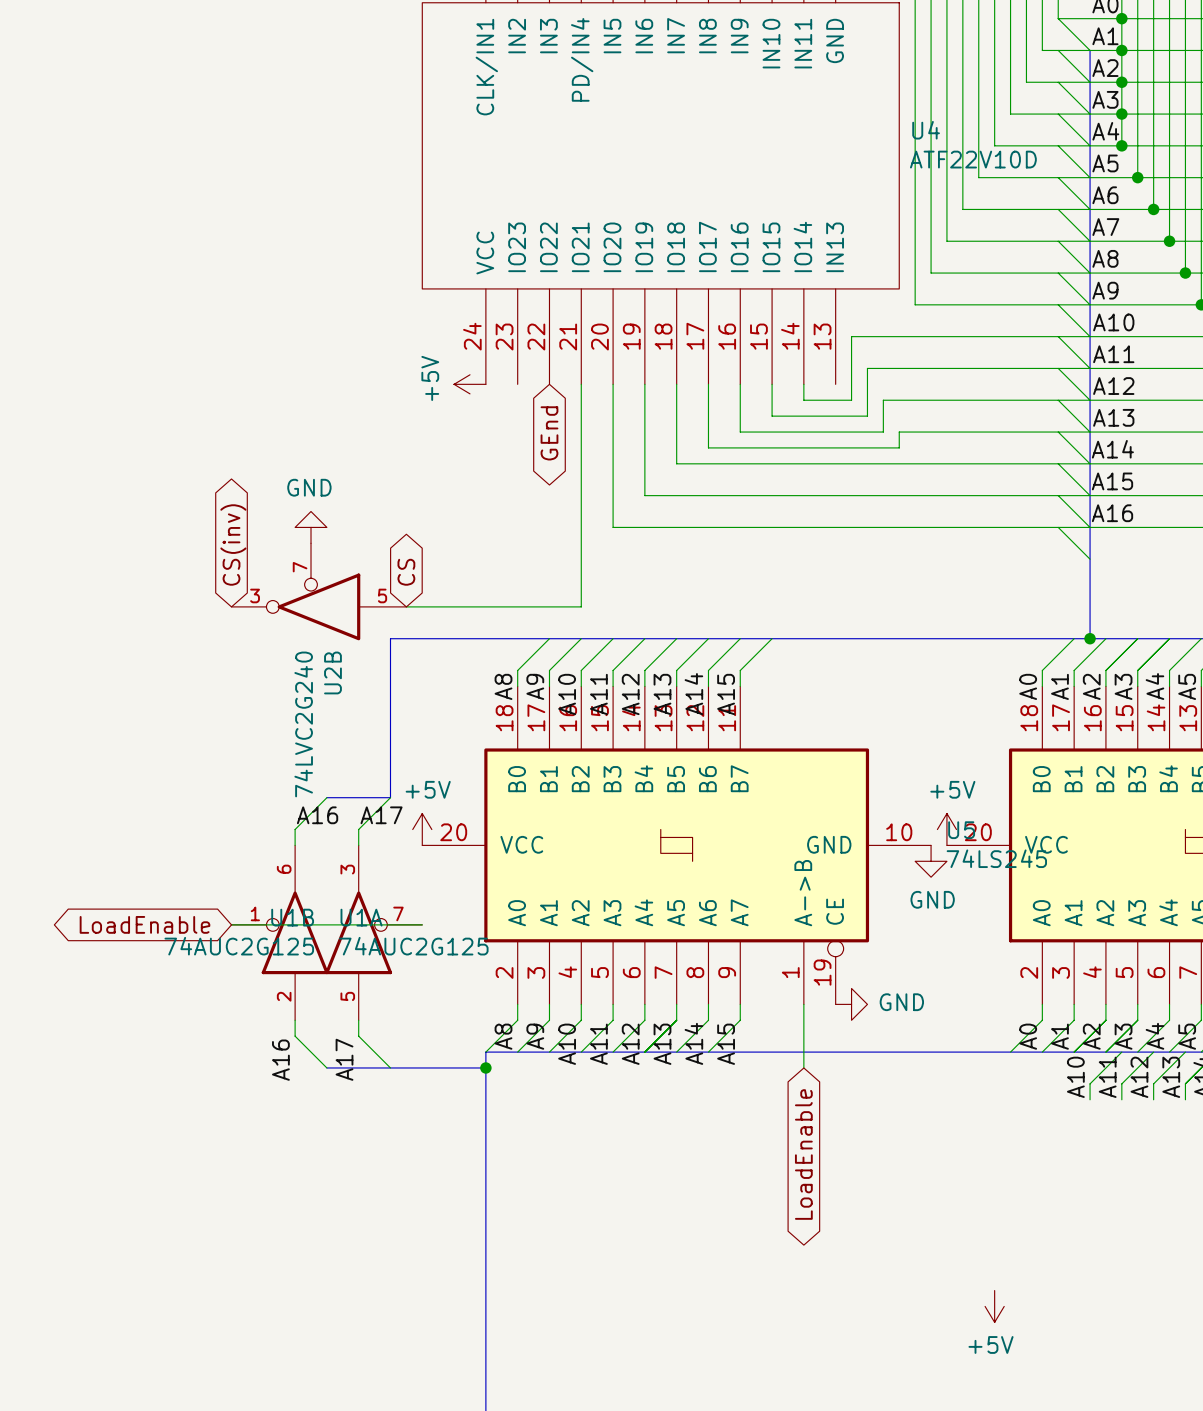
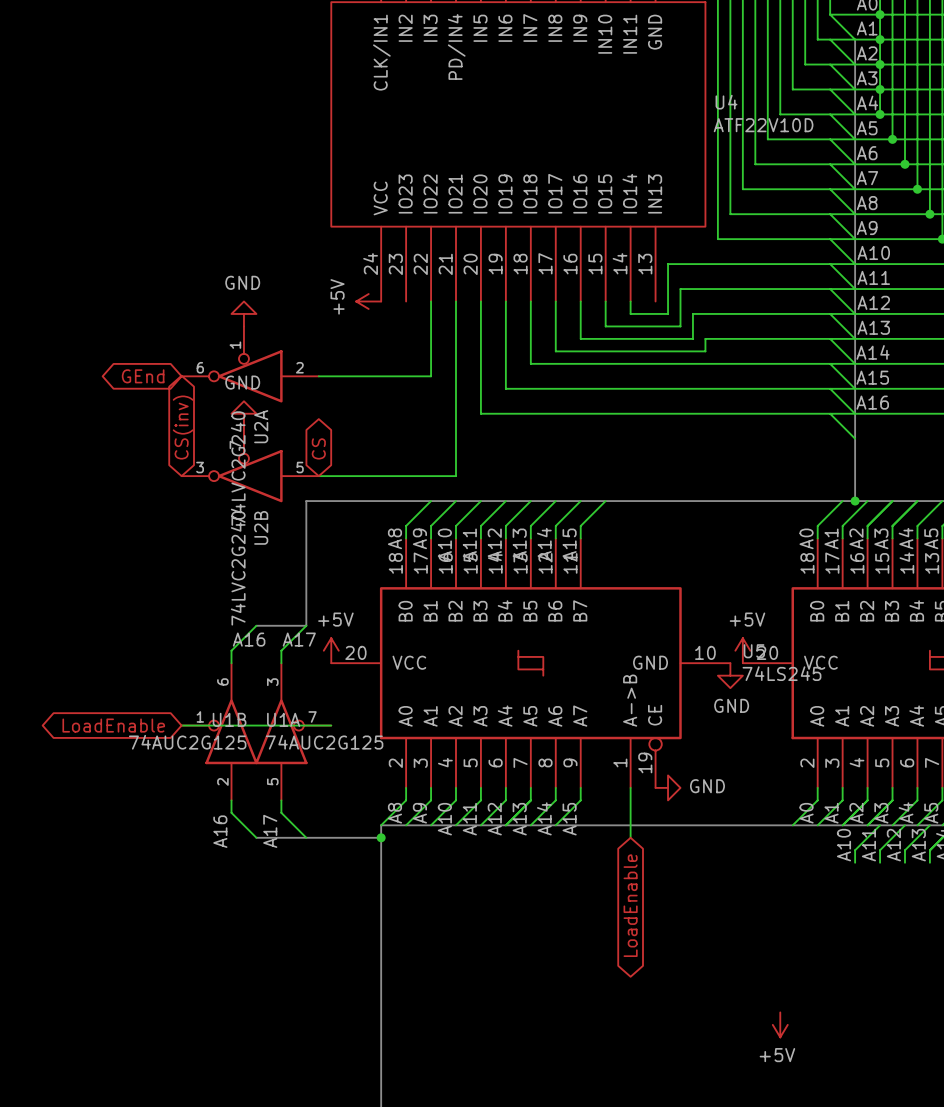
wire: none -> (431, 301) (431, 376) (318, 376)
power symbol: none -> GND (243, 313)
global label: GEnd (549, 433) -> none
U2A: none -> 74LVC2G240 (250, 364)
global label: none -> GEnd (143, 376)

